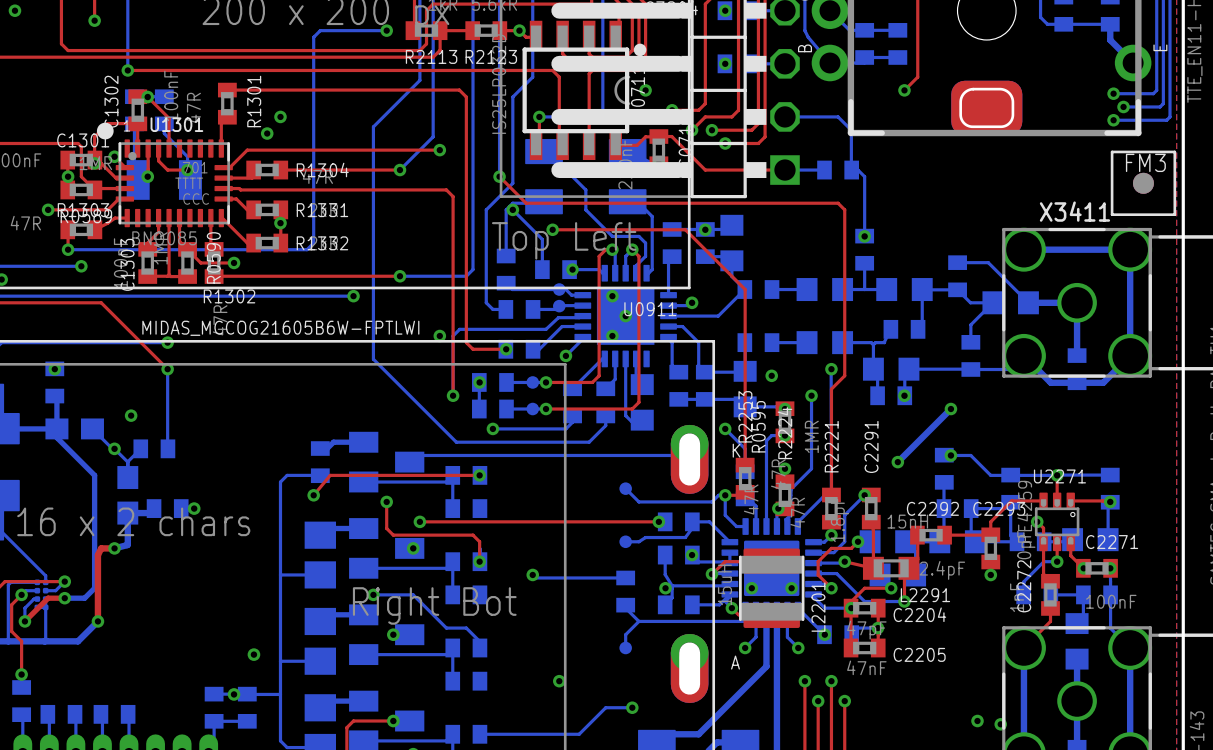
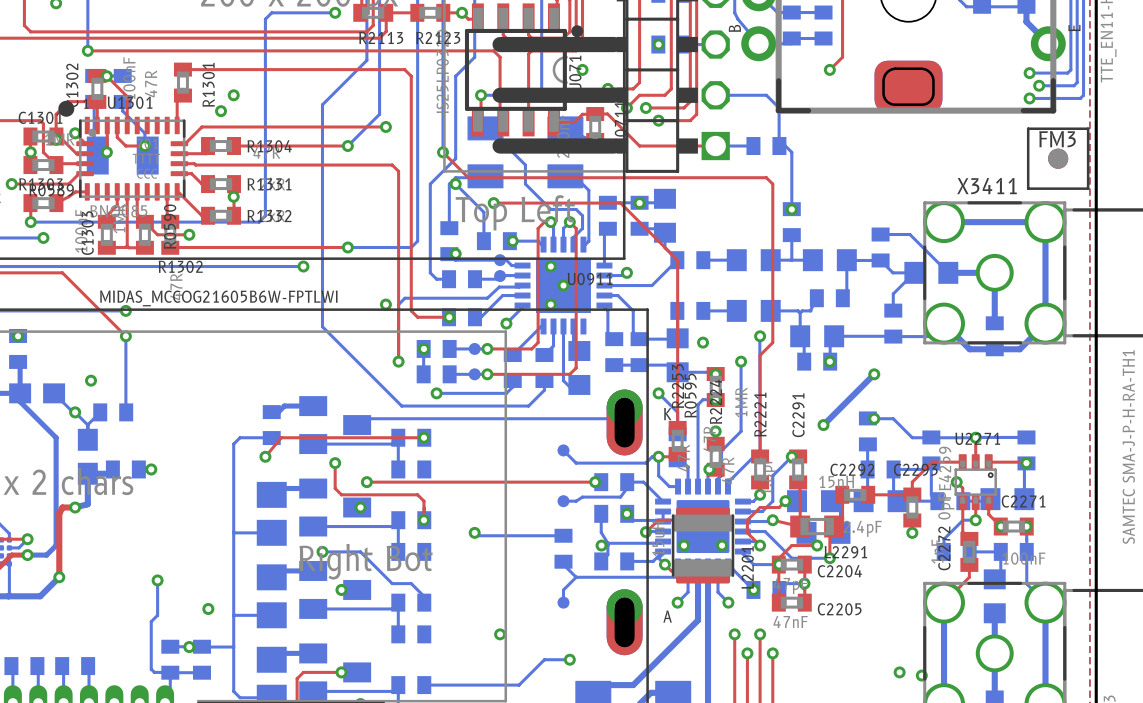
via: none -> (455, 253)
bottom track: none -> (157, 580) (157, 615) (151, 621) (151, 669) (154, 672) (170, 672)
via: none -> (157, 580)

